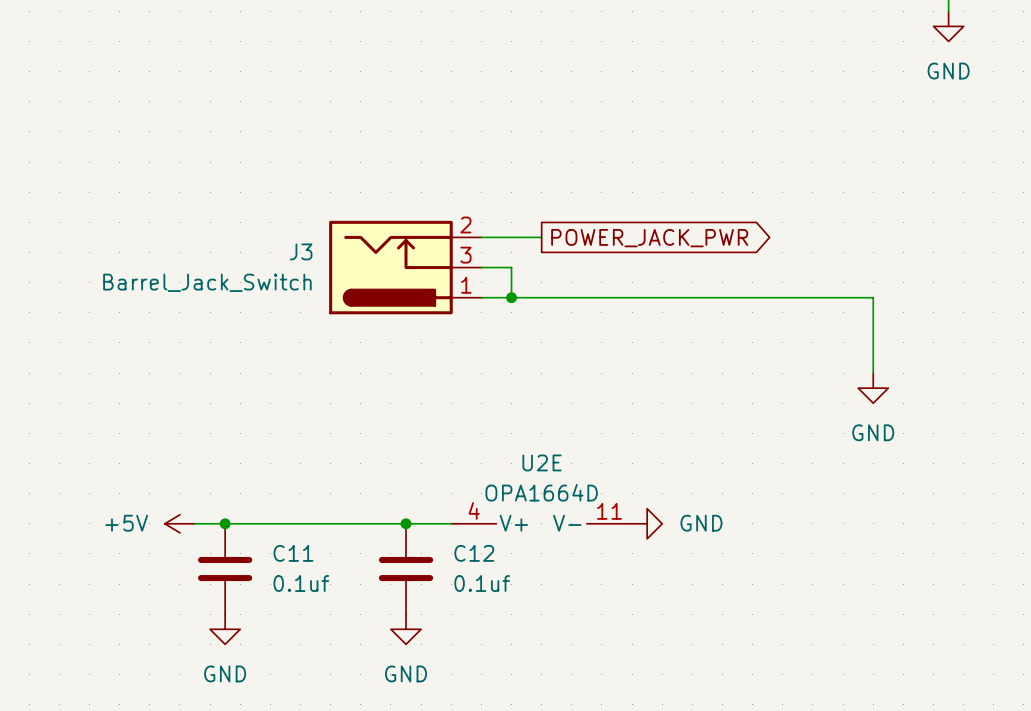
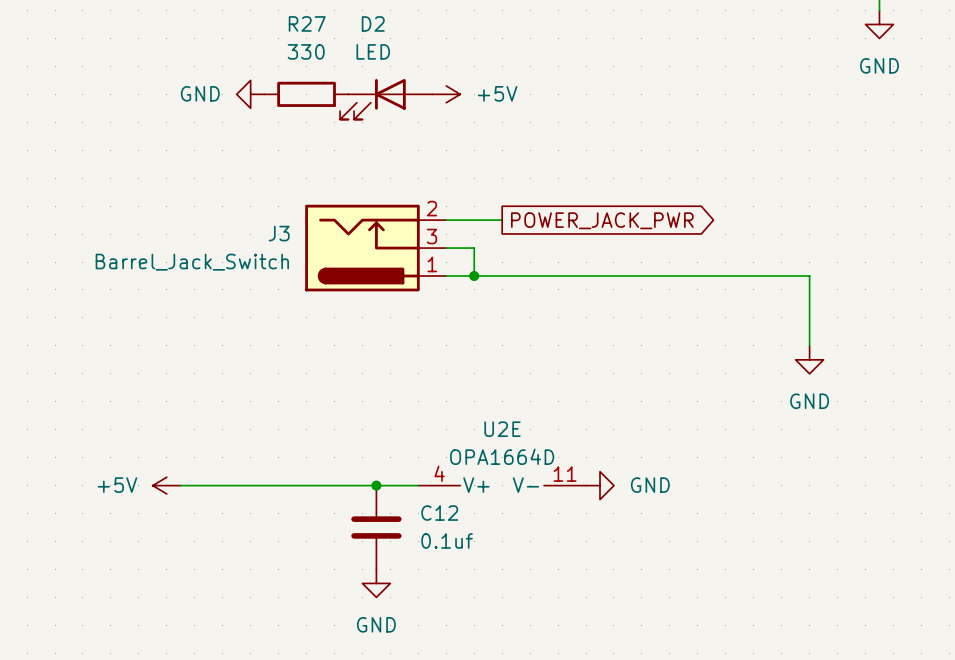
power symbol: none -> GND (250, 94)
R27: none -> 330 (306, 94)
power symbol: none -> +5V (446, 94)
D2: none -> LED (386, 99)
junction: (225, 523) -> none
C11: 0.1uf (225, 569) -> none
power symbol: GND (225, 629) -> none

